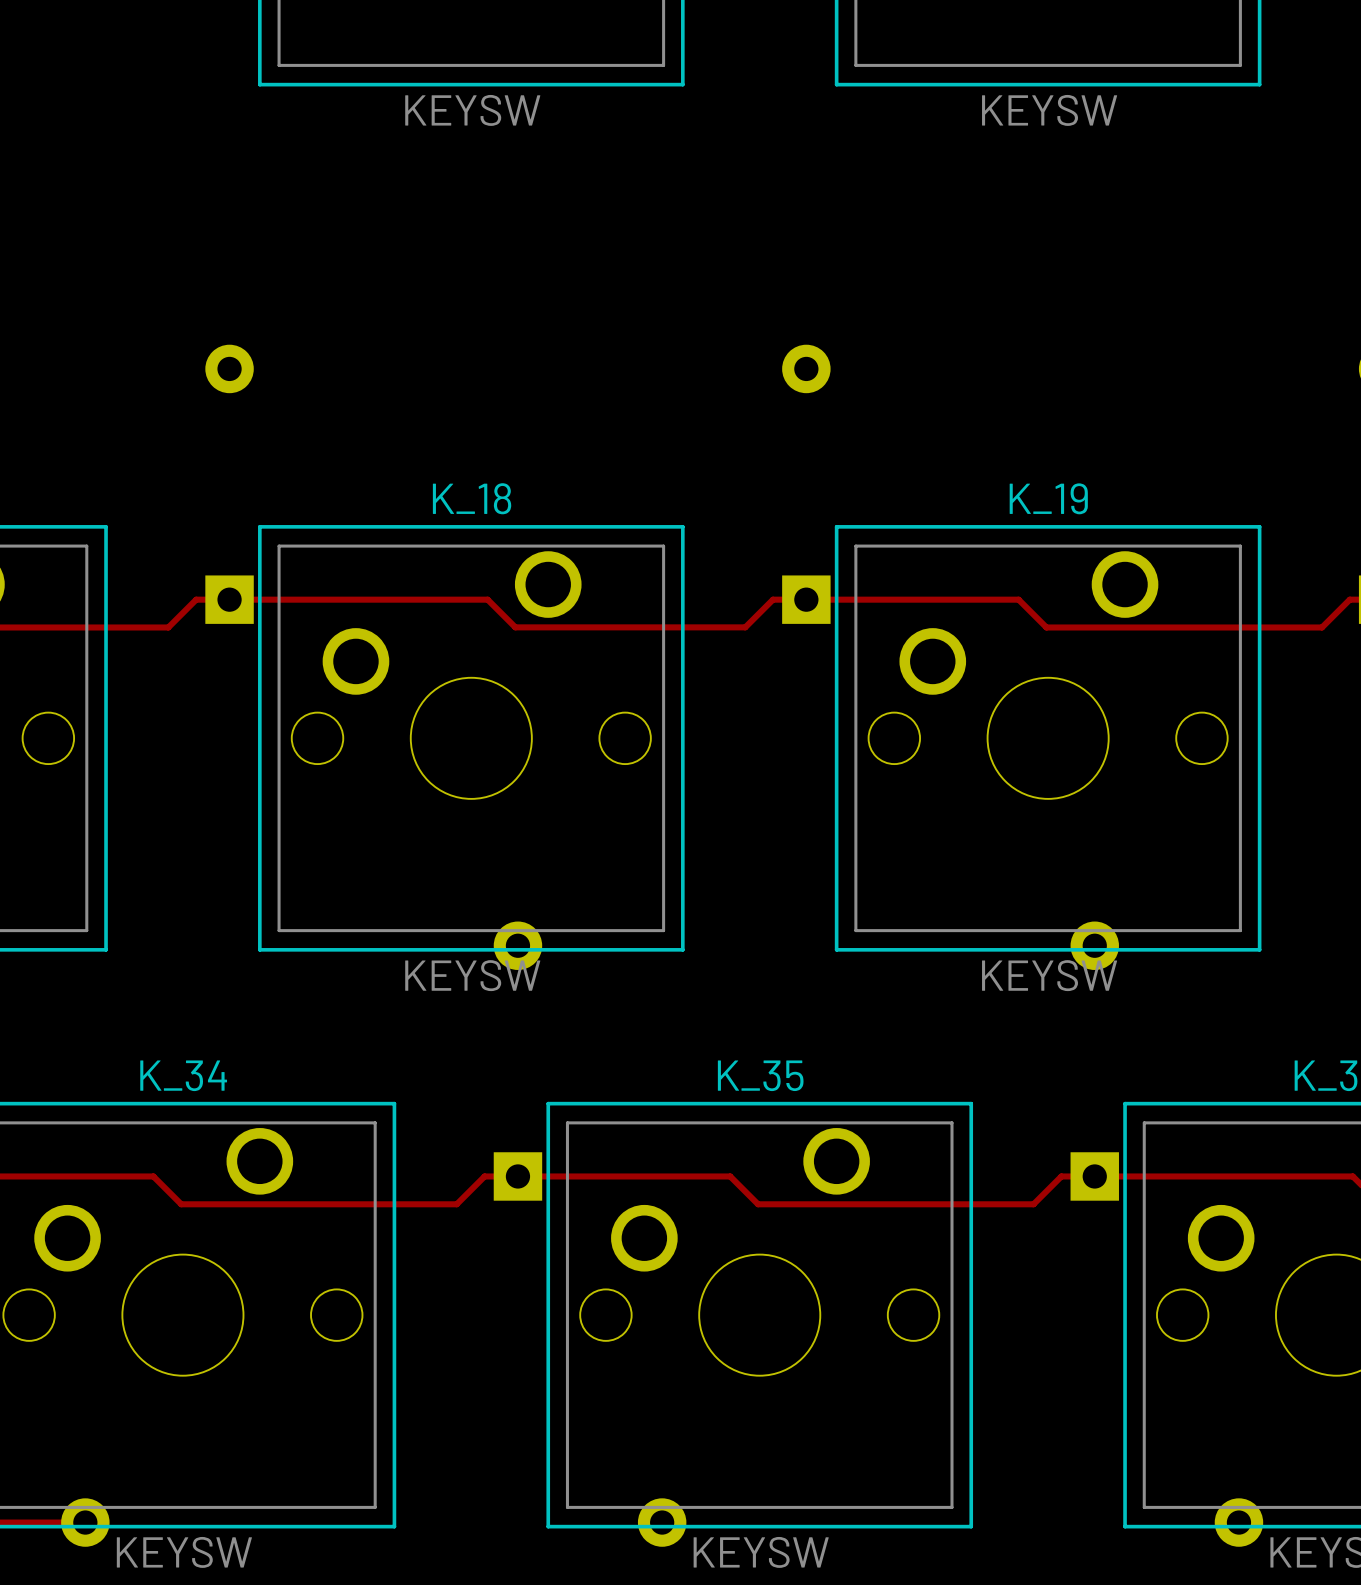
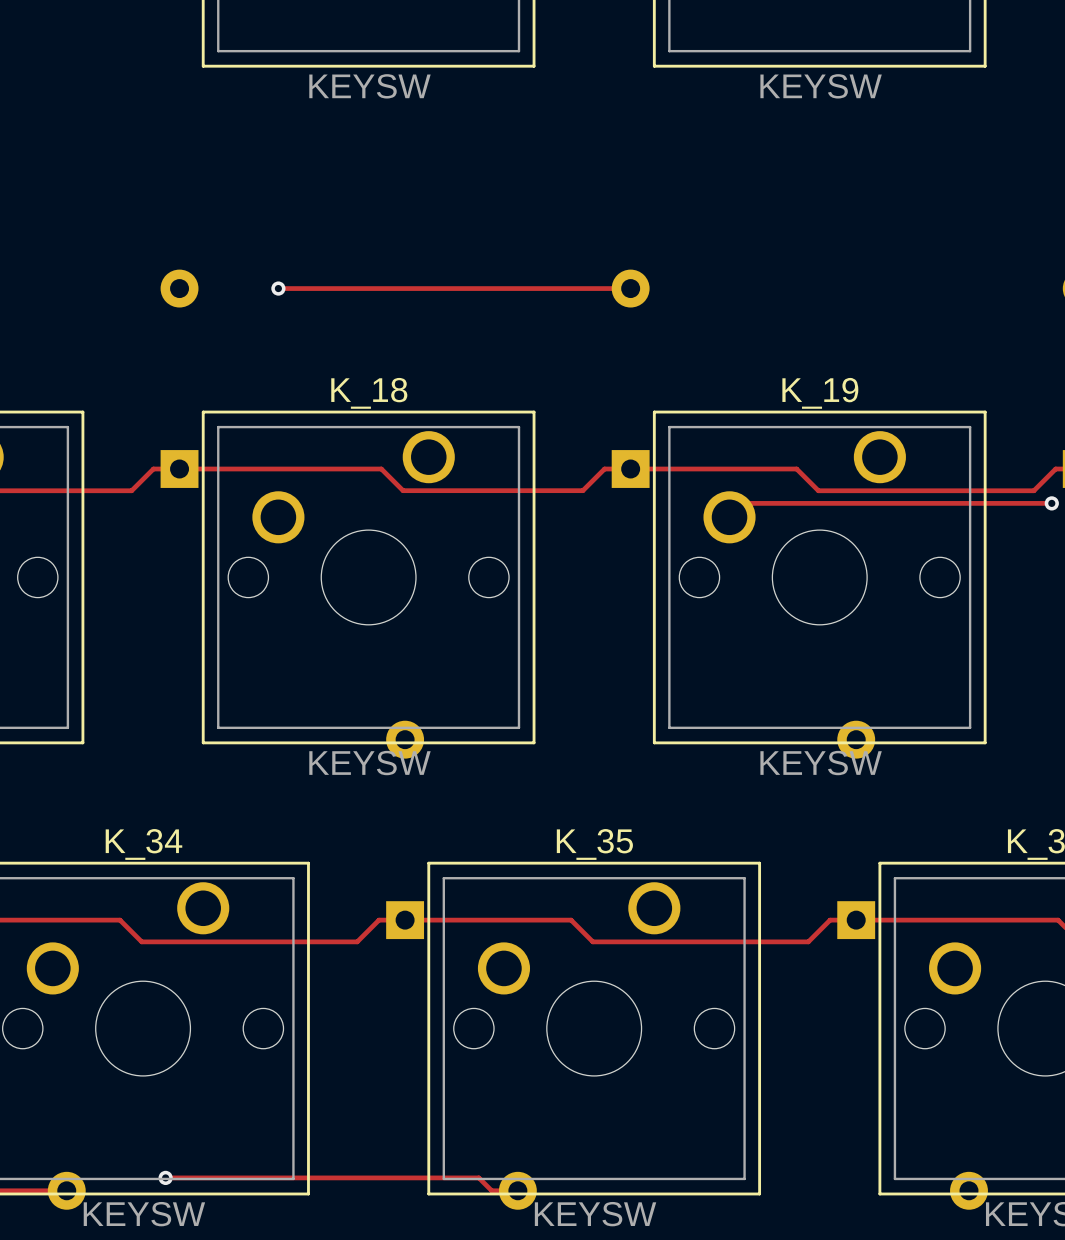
track: none -> (278, 288) (630, 288)
via: none -> (278, 288)
track: none -> (1051, 503) (743, 503) (729, 517)
via: none -> (1051, 503)
track: none -> (165, 1177) (478, 1177) (491, 1190) (517, 1190)
via: none -> (165, 1177)

